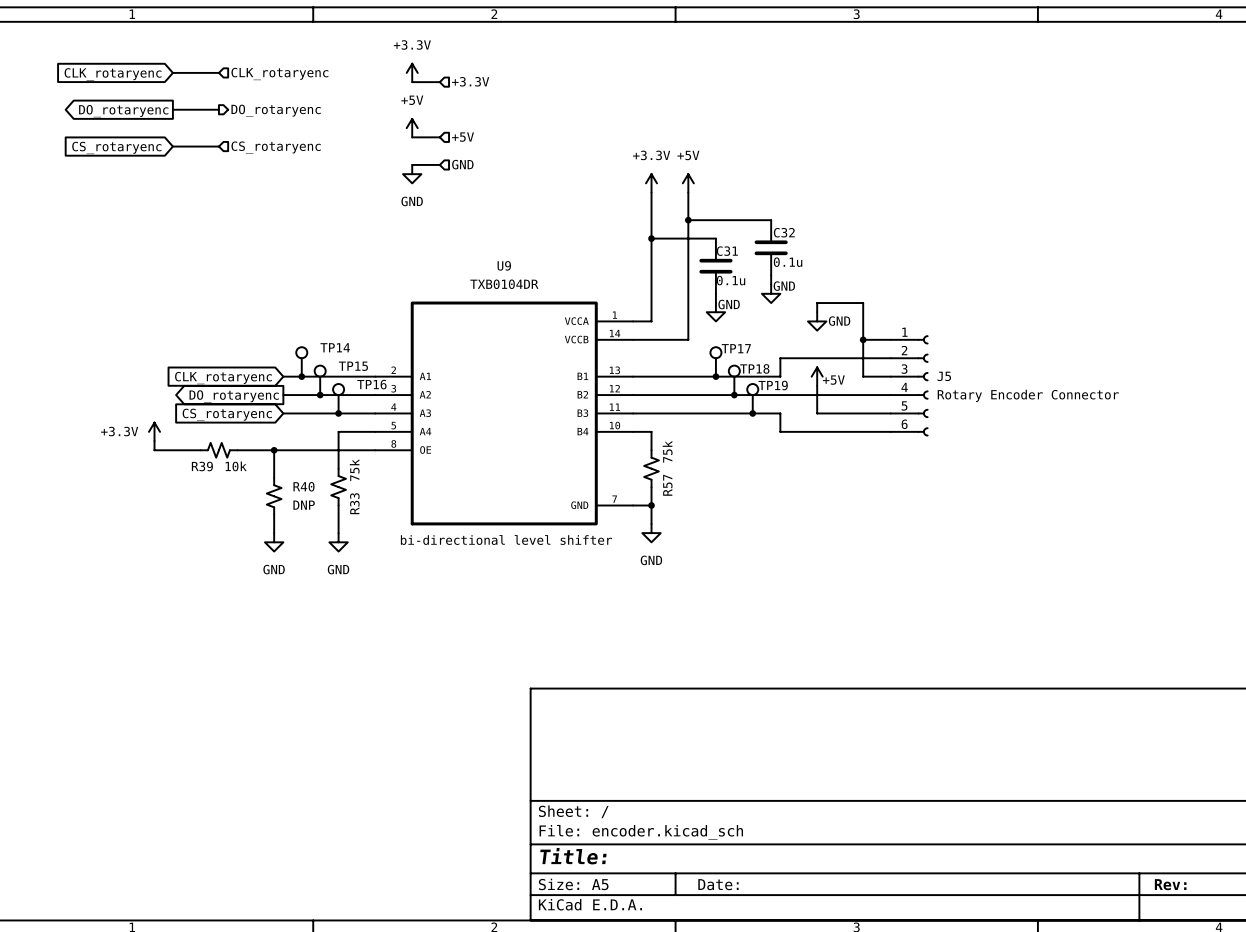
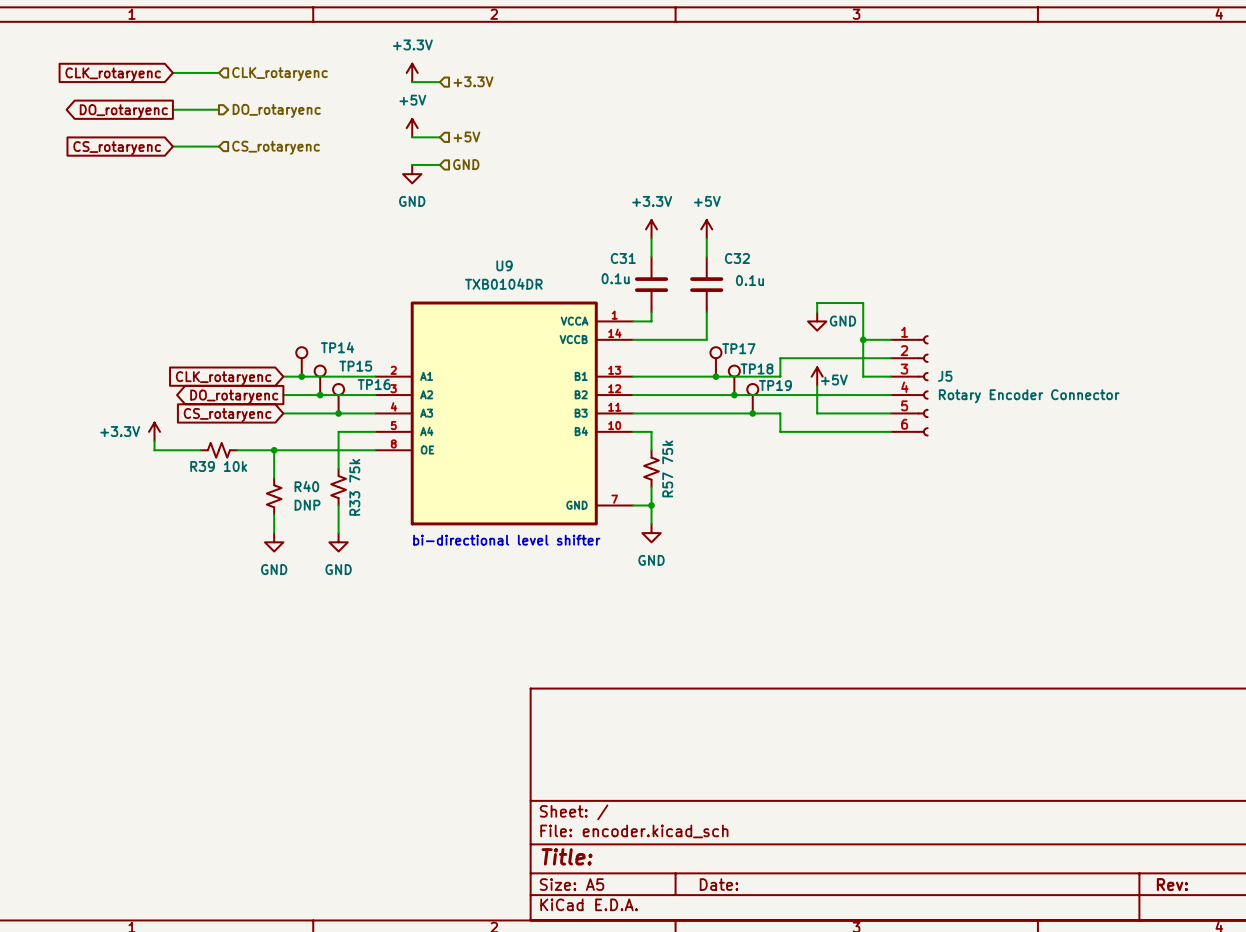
power symbol position: +3.3V (651, 183) -> +3.3V (651, 229)
power symbol position: +5V (688, 183) -> +5V (706, 229)
wire: (651, 192) (651, 238) (715, 238) -> none
wire: (688, 192) (688, 339) -> (706, 312) (706, 339) (688, 339)
wire: (688, 220) (771, 220) -> none
junction: (688, 220) -> none
C32 name position: C32 (784, 232) -> C32 (737, 258)
junction: (651, 238) -> none
wire: none -> (706, 238) (706, 257)
C32 position: (771, 247) -> (706, 284)
C31 name position: C31 (727, 251) -> C31 (623, 258)
C32 value position: 0.1u (788, 262) -> 0.1u (749, 280)
C31 position: (715, 266) -> (651, 284)
wire: (771, 275) (771, 284) -> none
C31 value position: 0.1u (730, 280) -> 0.1u (615, 278)
wire: (715, 293) (715, 303) -> none
power symbol: GND (771, 293) -> none
power symbol: GND (715, 312) -> none

